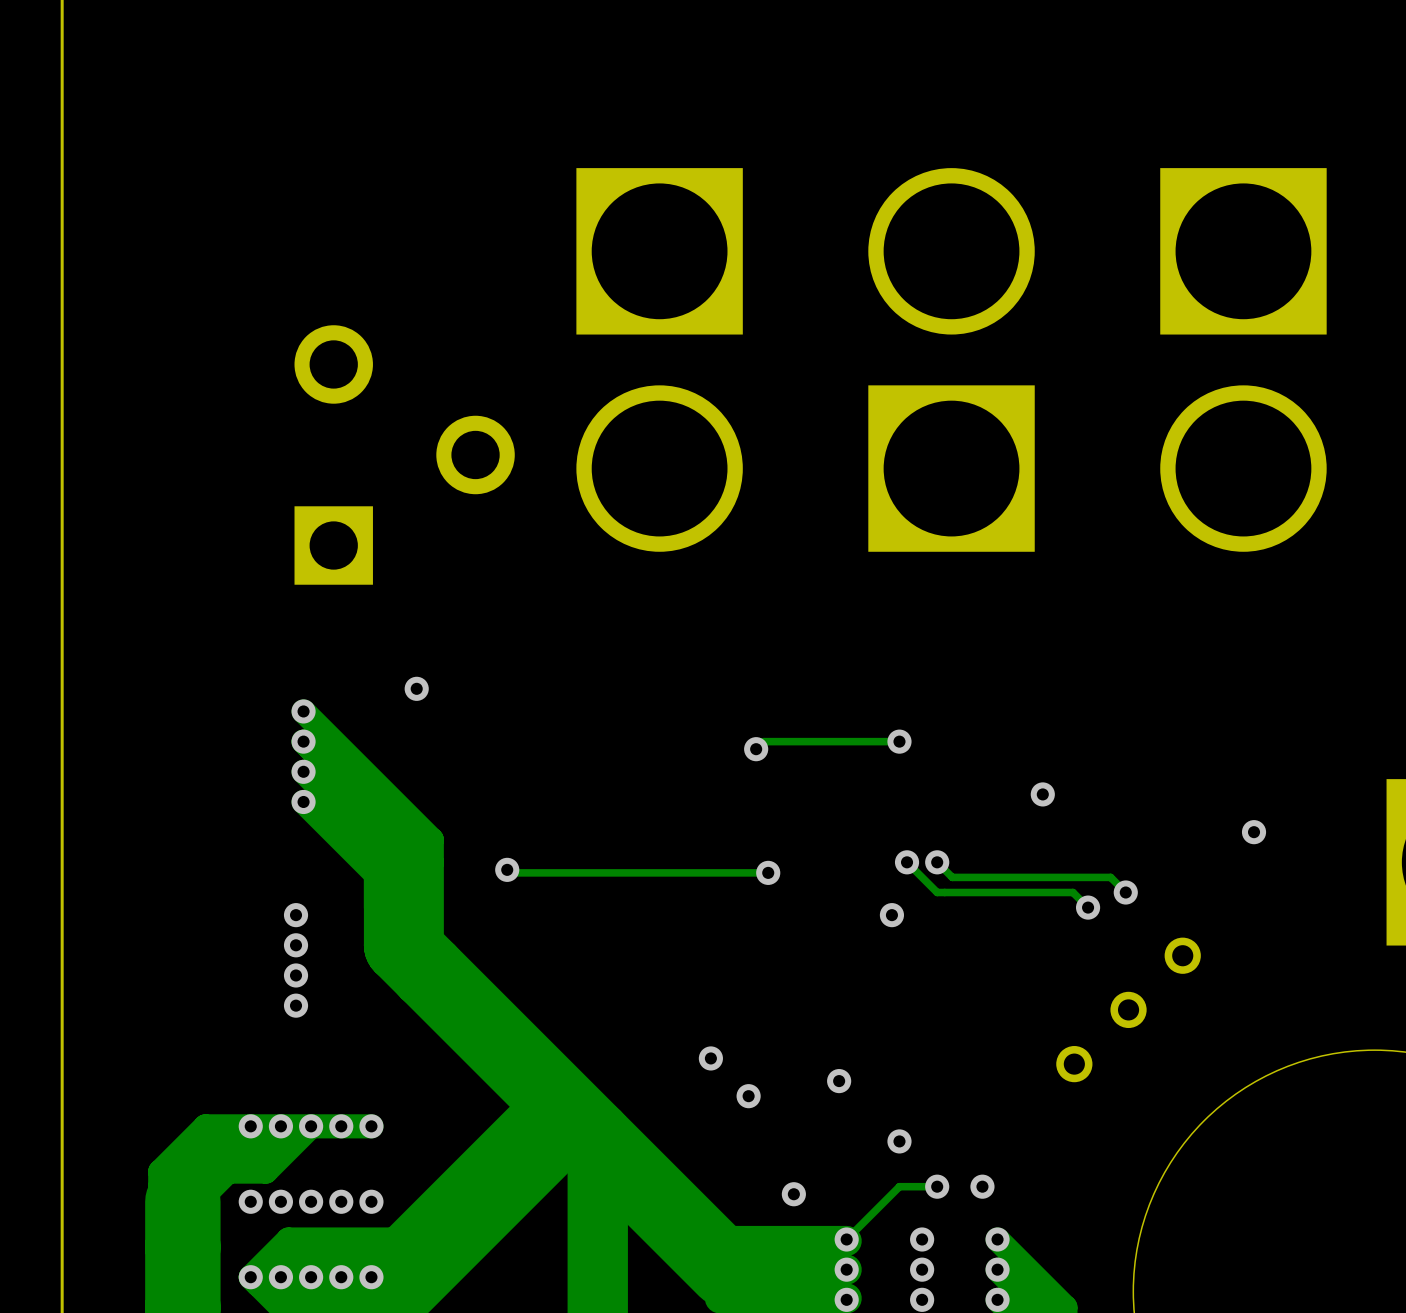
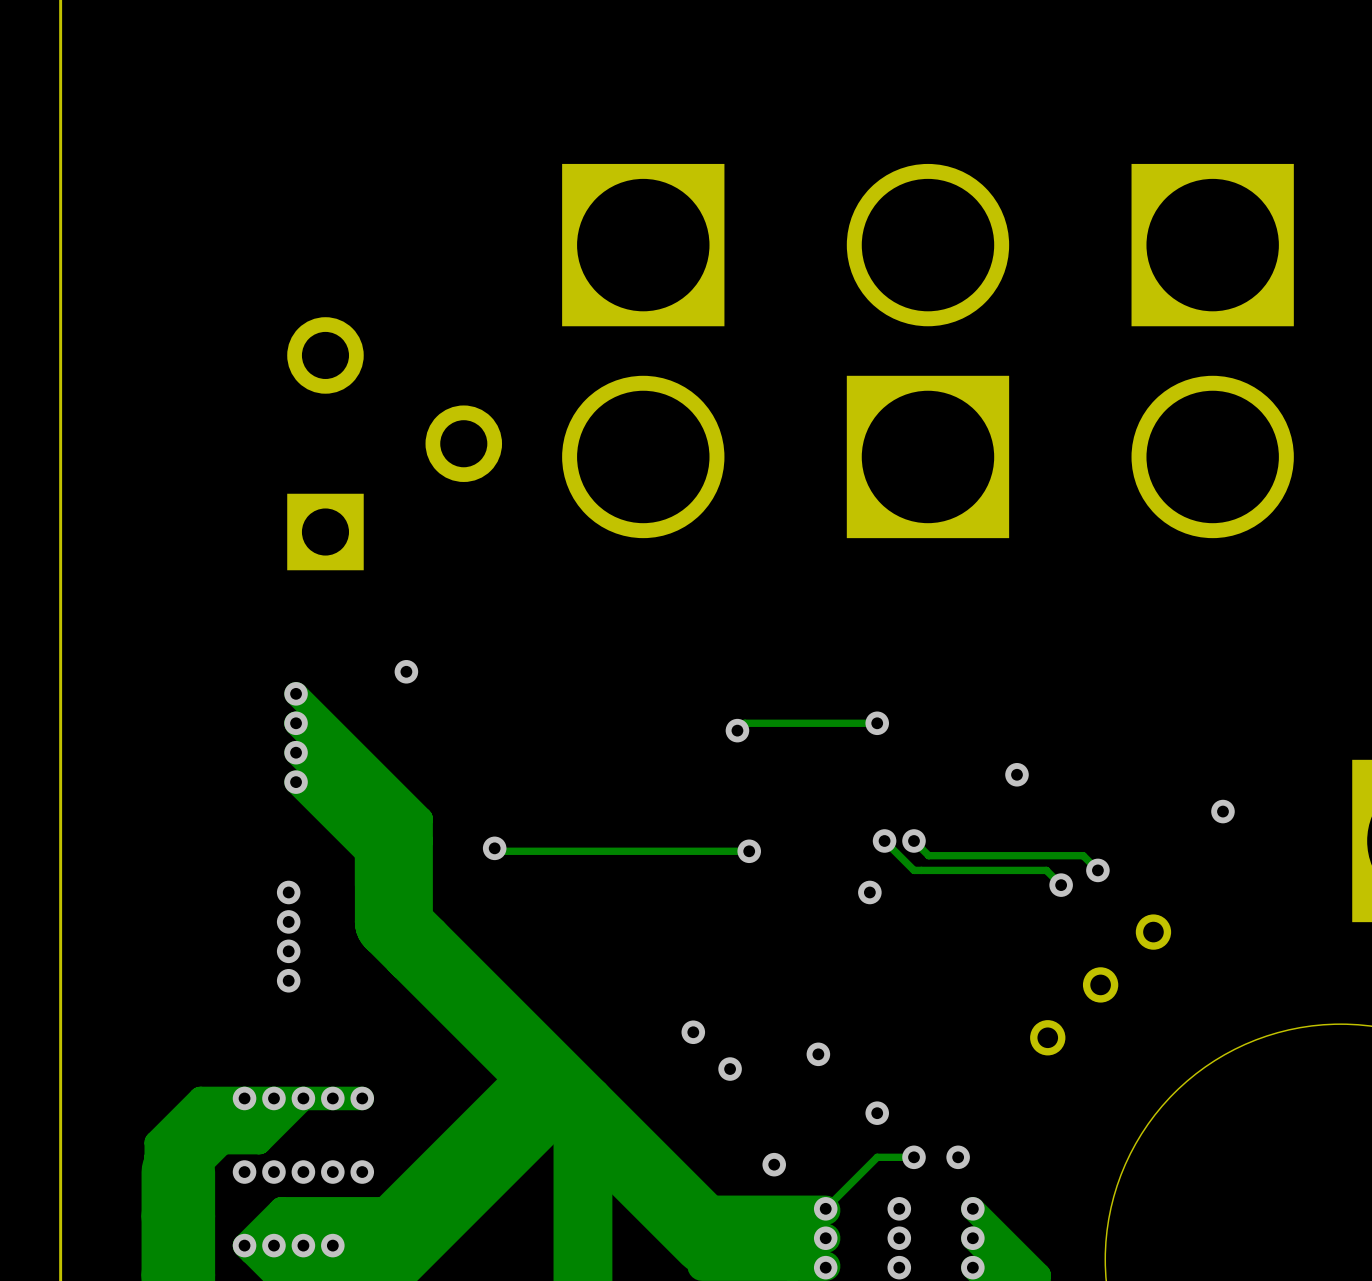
via: (371, 1277) -> none

